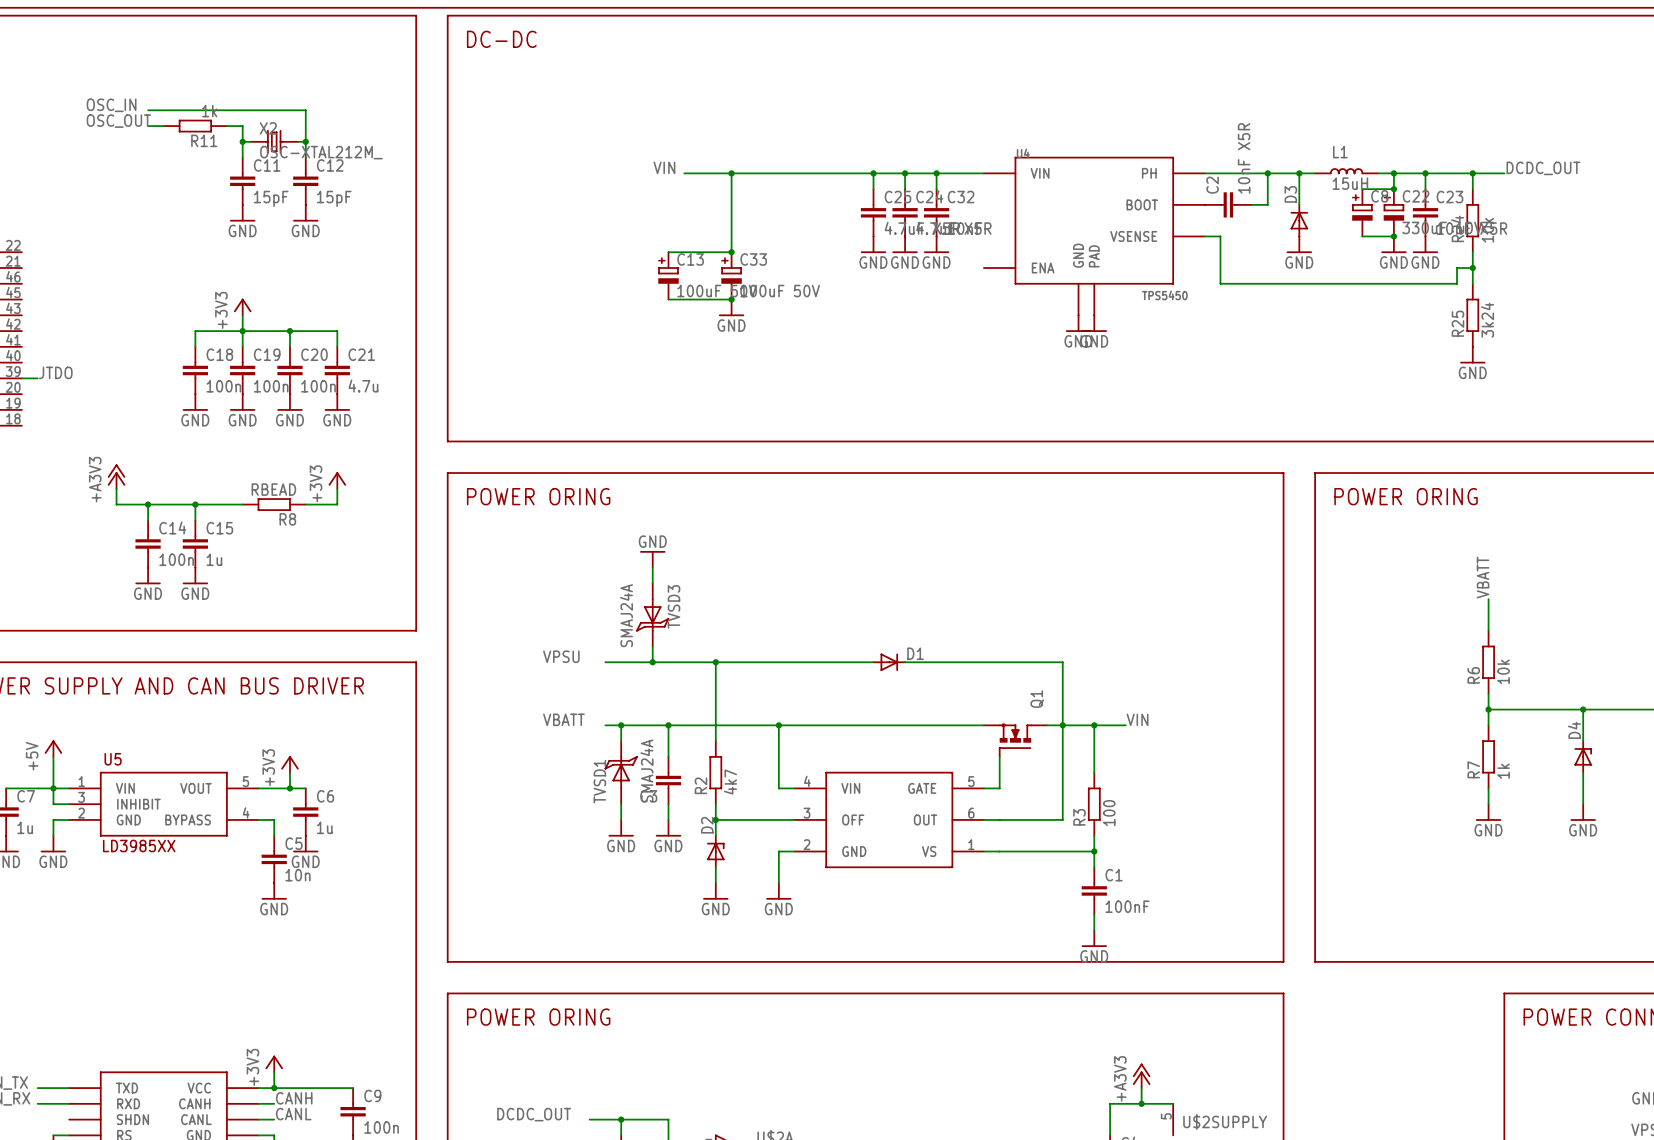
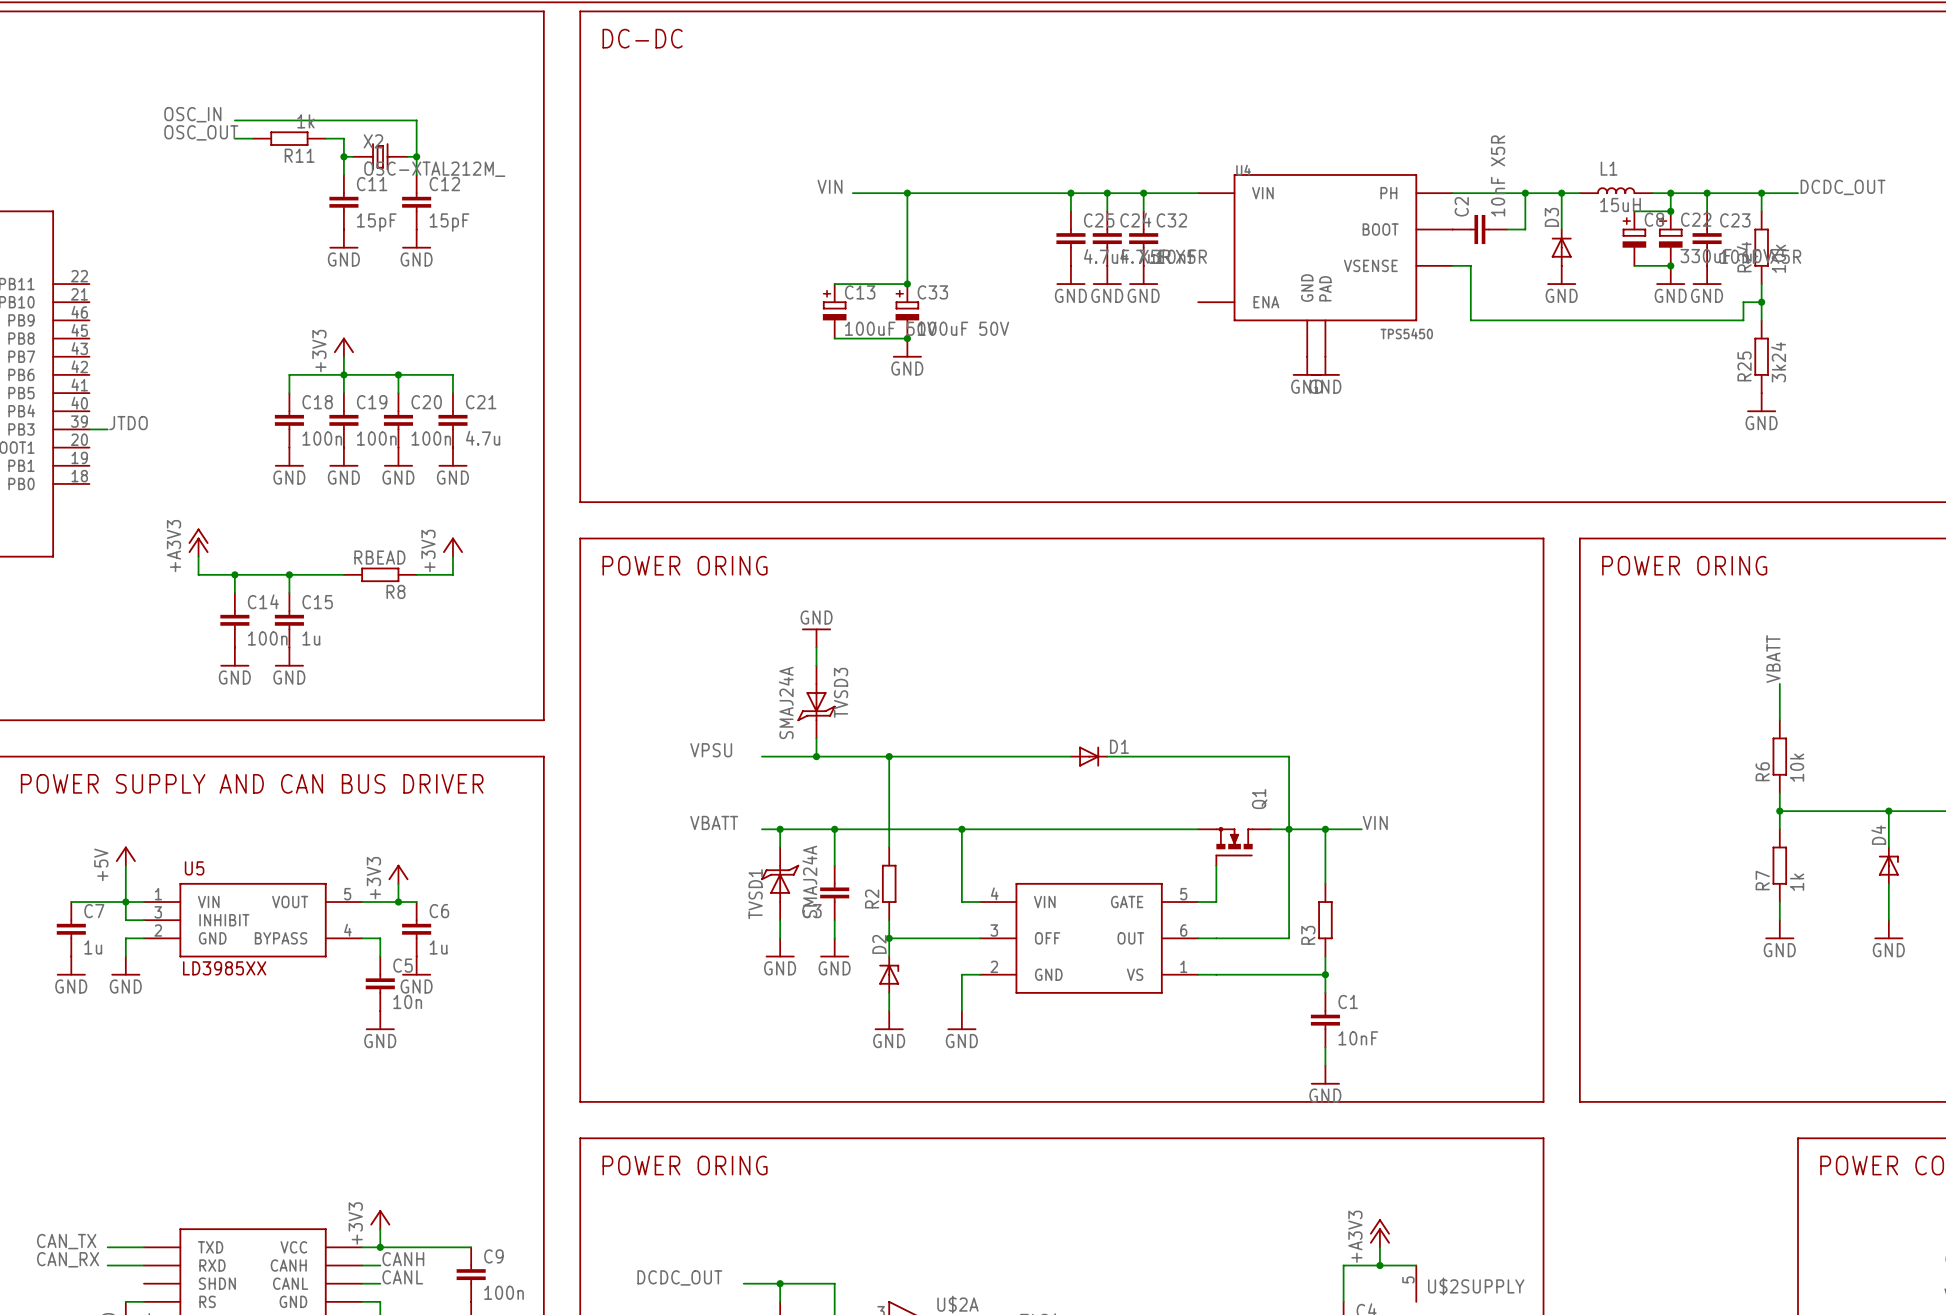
R2 value: 4k7 (730, 782) -> none
R3 value: 100 (1109, 813) -> none
C1 value: 100nF (1127, 906) -> 10nF (1358, 1038)

